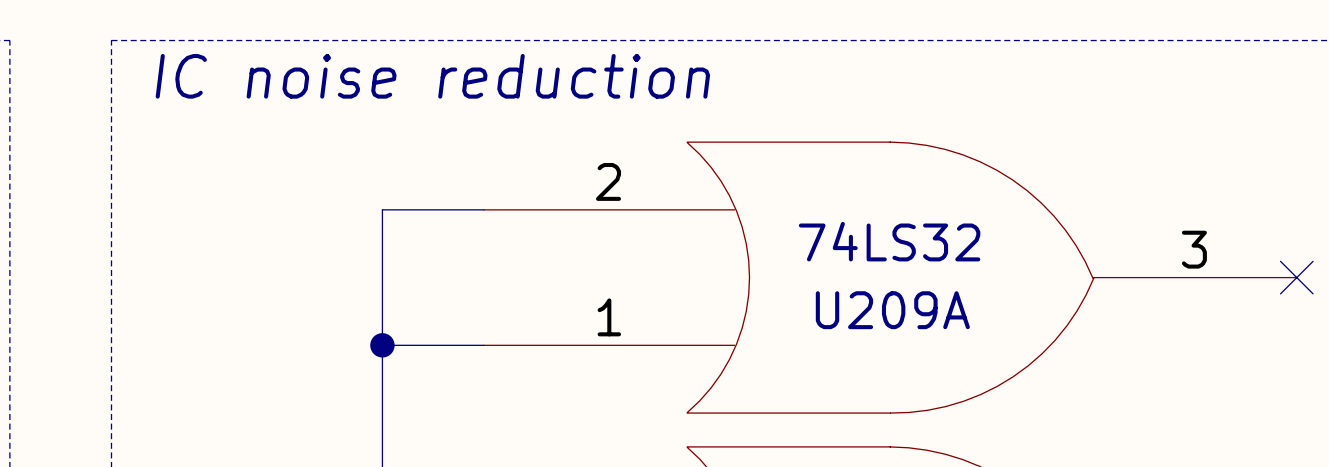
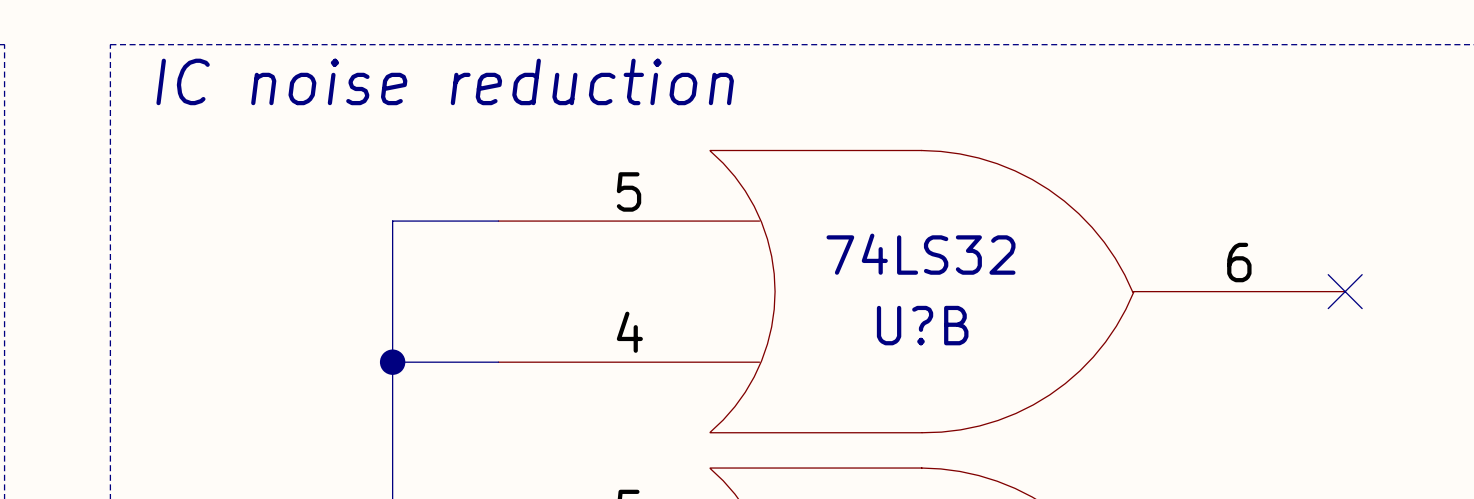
U209A pin number: 2 (608, 181) -> 5 (629, 191)
U209A pin number: 3 (1194, 249) -> 6 (1239, 262)
U209A name: U209A (892, 310) -> U?B (922, 325)
U209A pin number: 1 (609, 317) -> 4 (629, 332)

